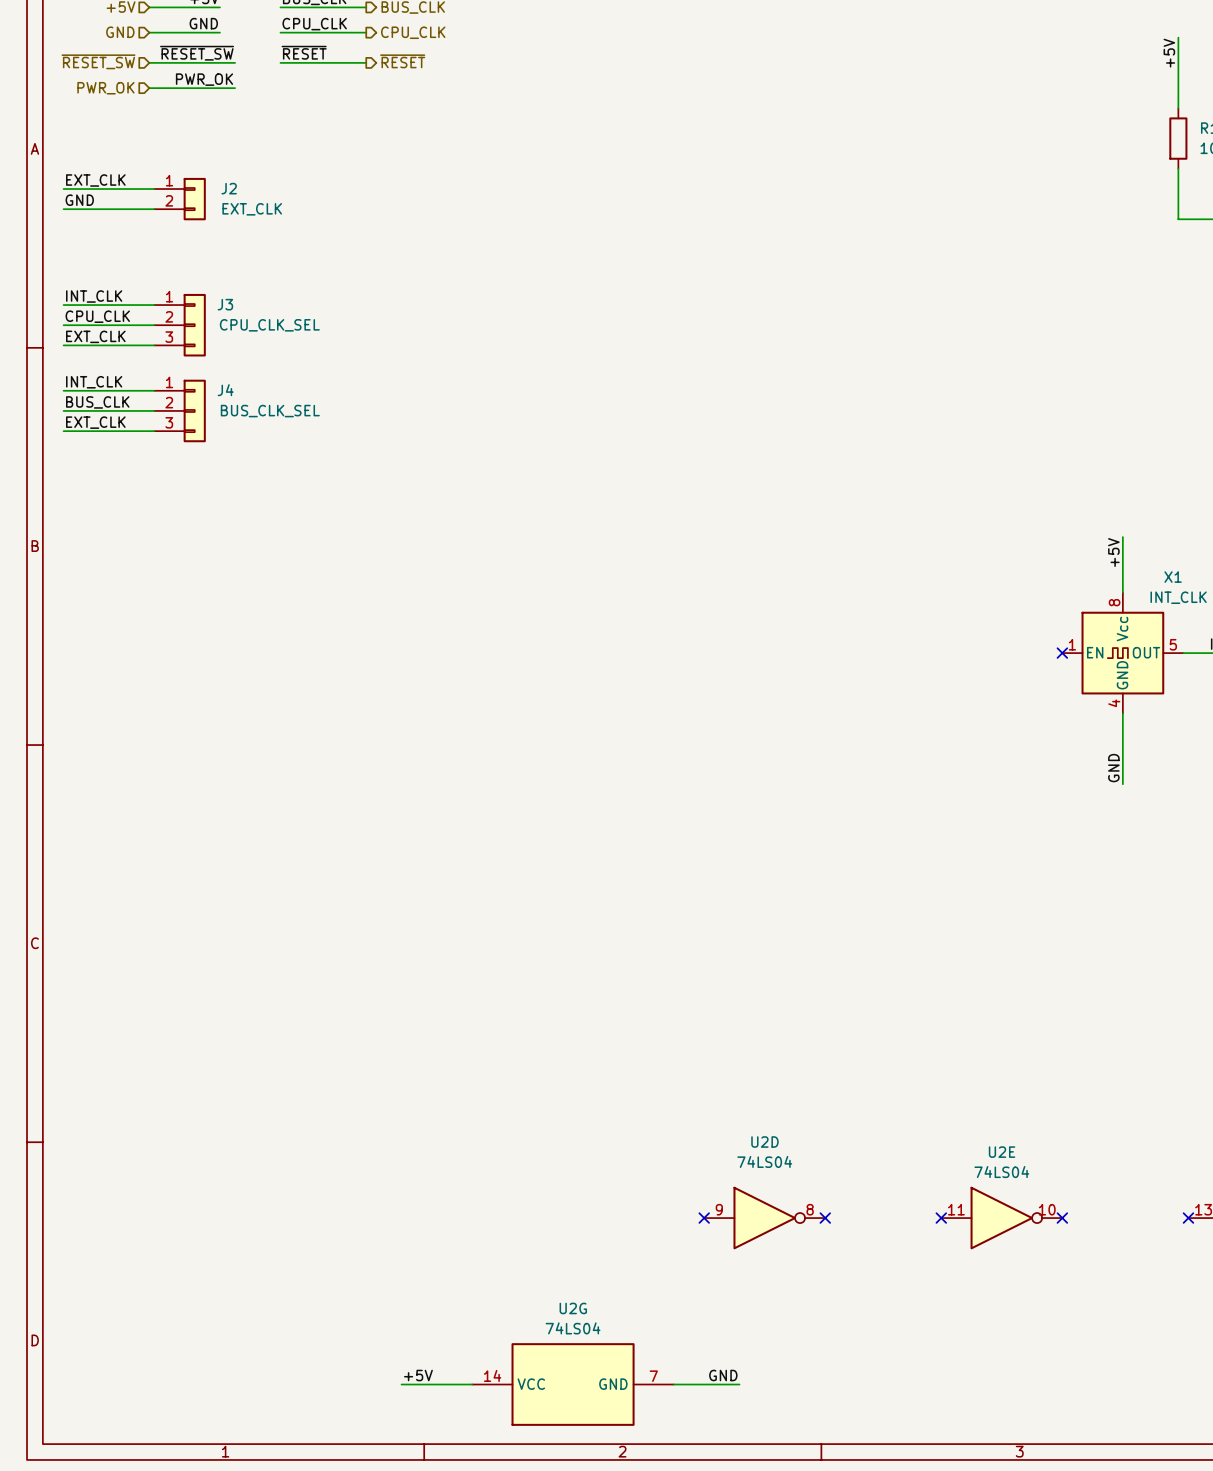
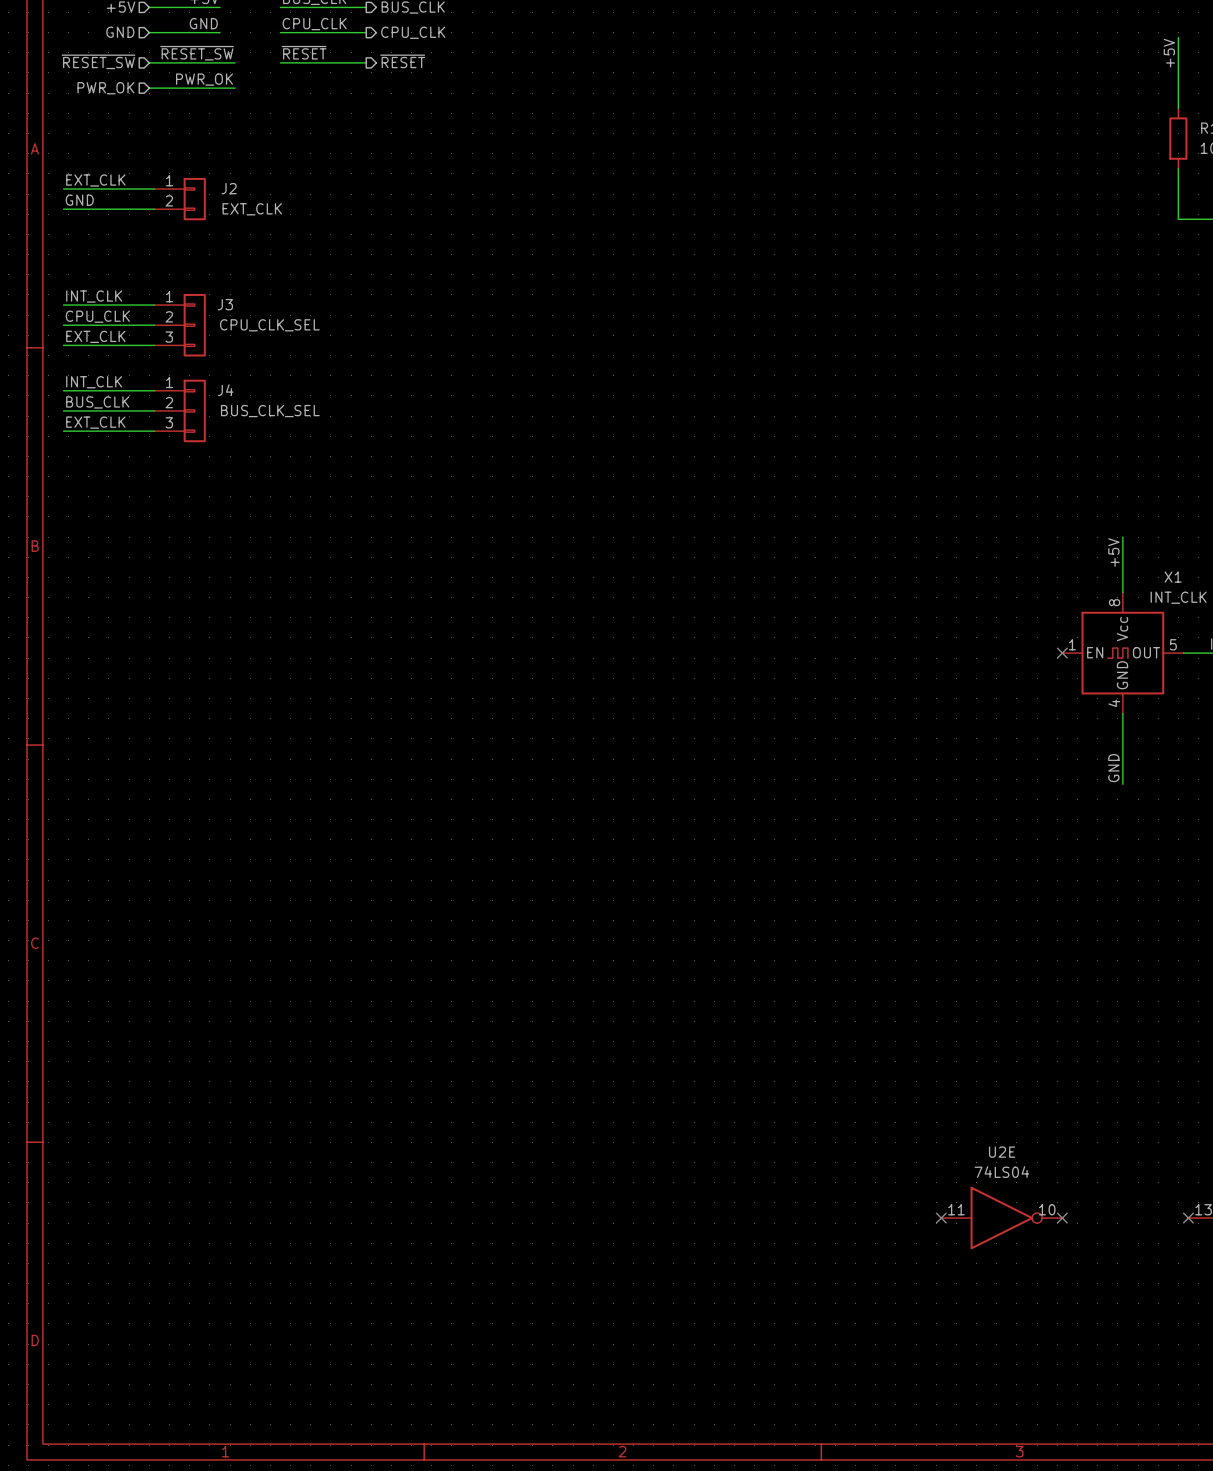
no-connect mark: (704, 1218) -> none
U2D: 74LS04 (764, 1218) -> none
no-connect mark: (825, 1218) -> none
label: +5V (418, 1375) -> none
label: GND (723, 1375) -> none
wire: (401, 1384) (472, 1384) -> none
U2G: 74LS04 (573, 1384) -> none
wire: (673, 1384) (739, 1384) -> none

